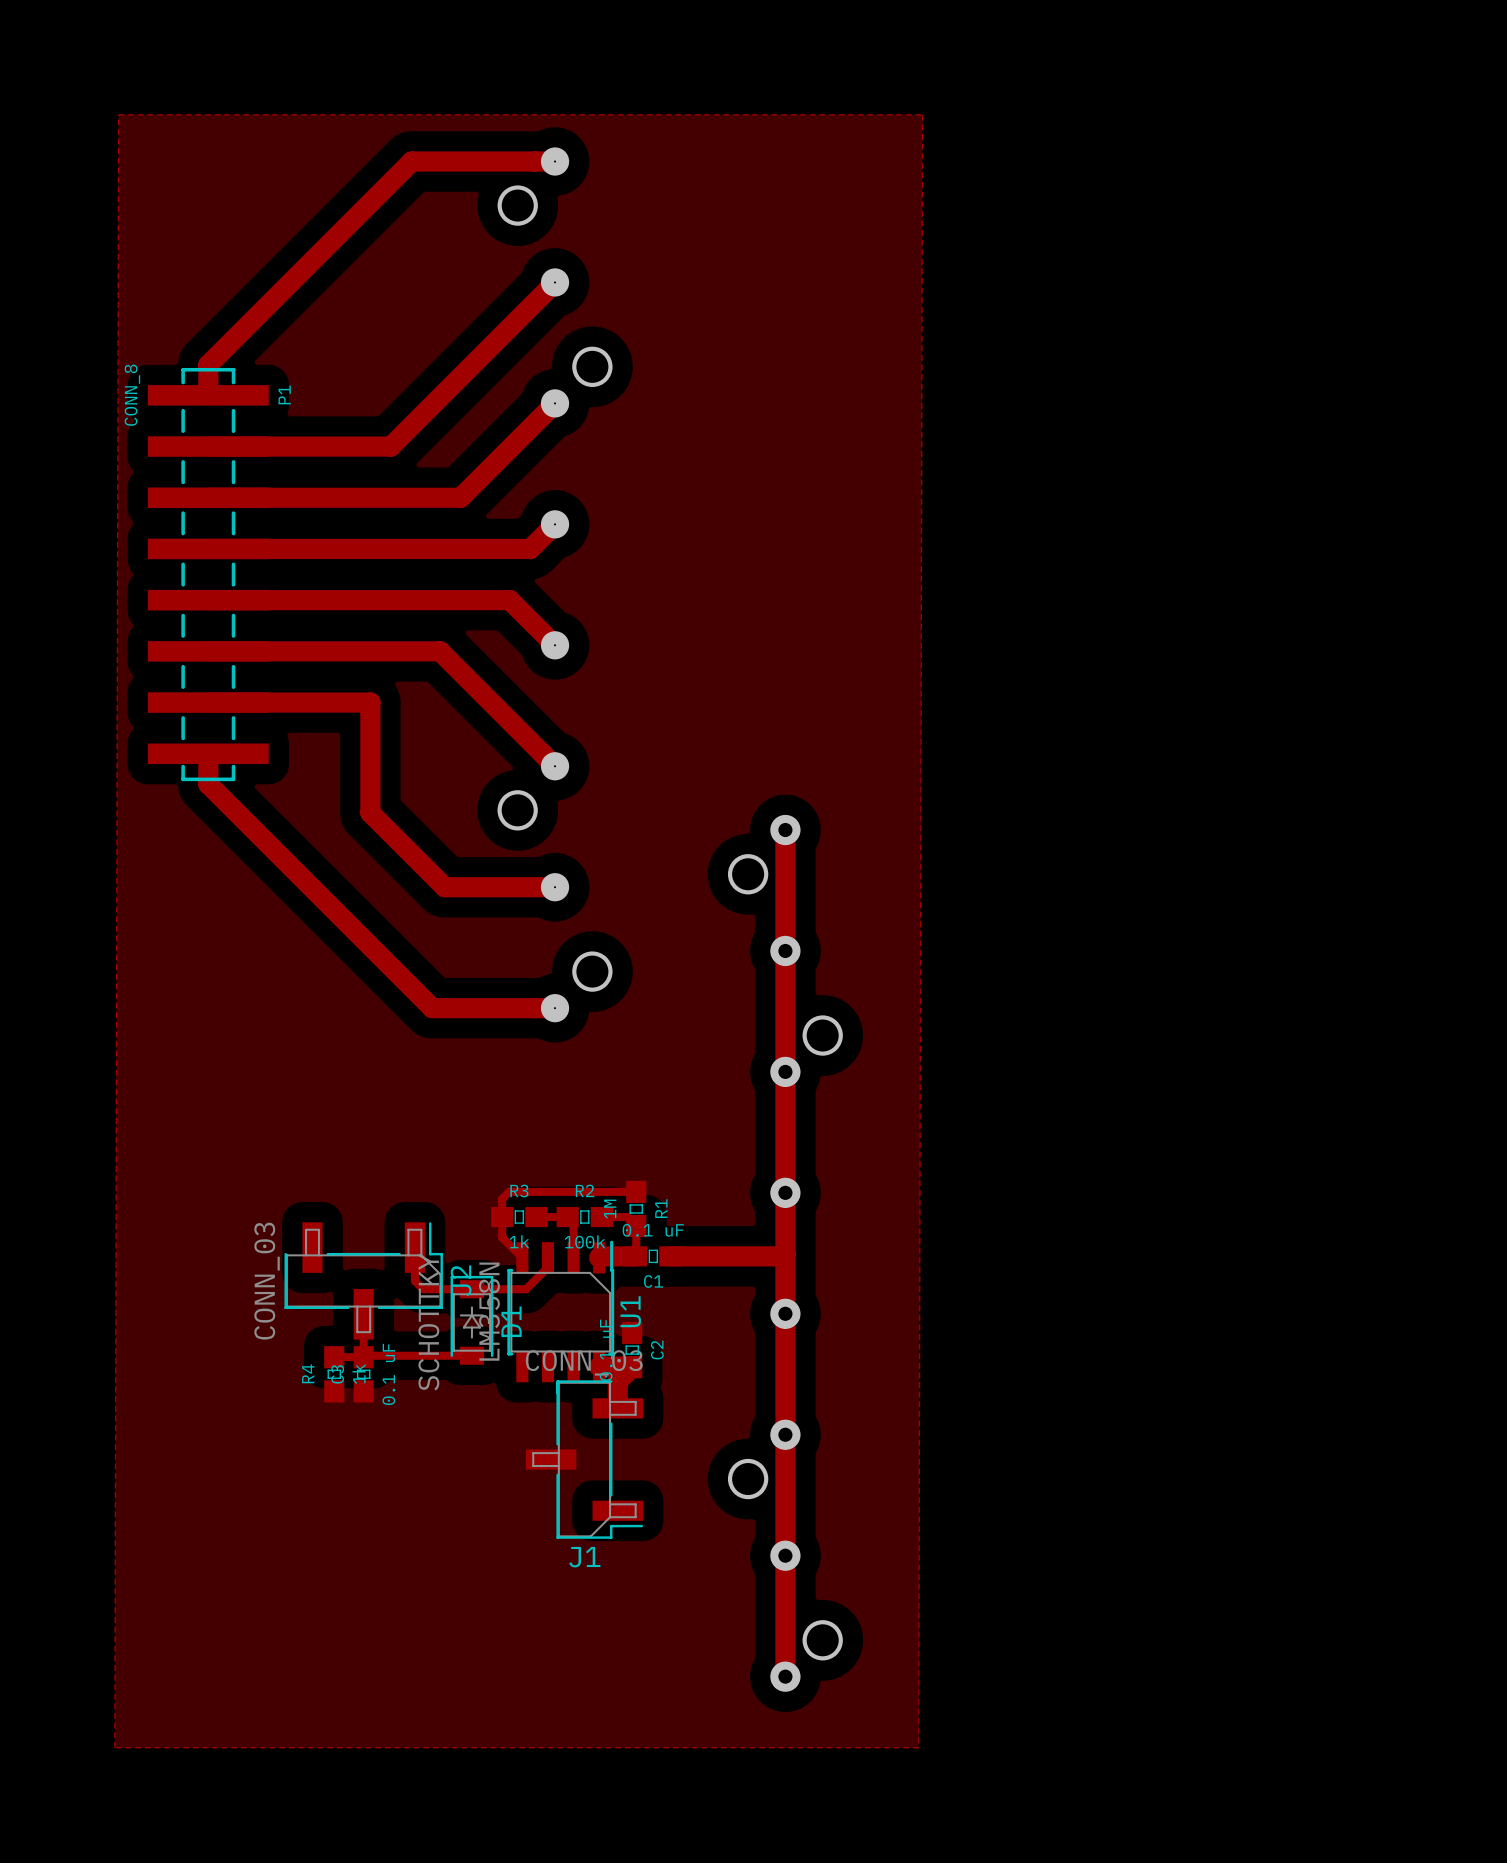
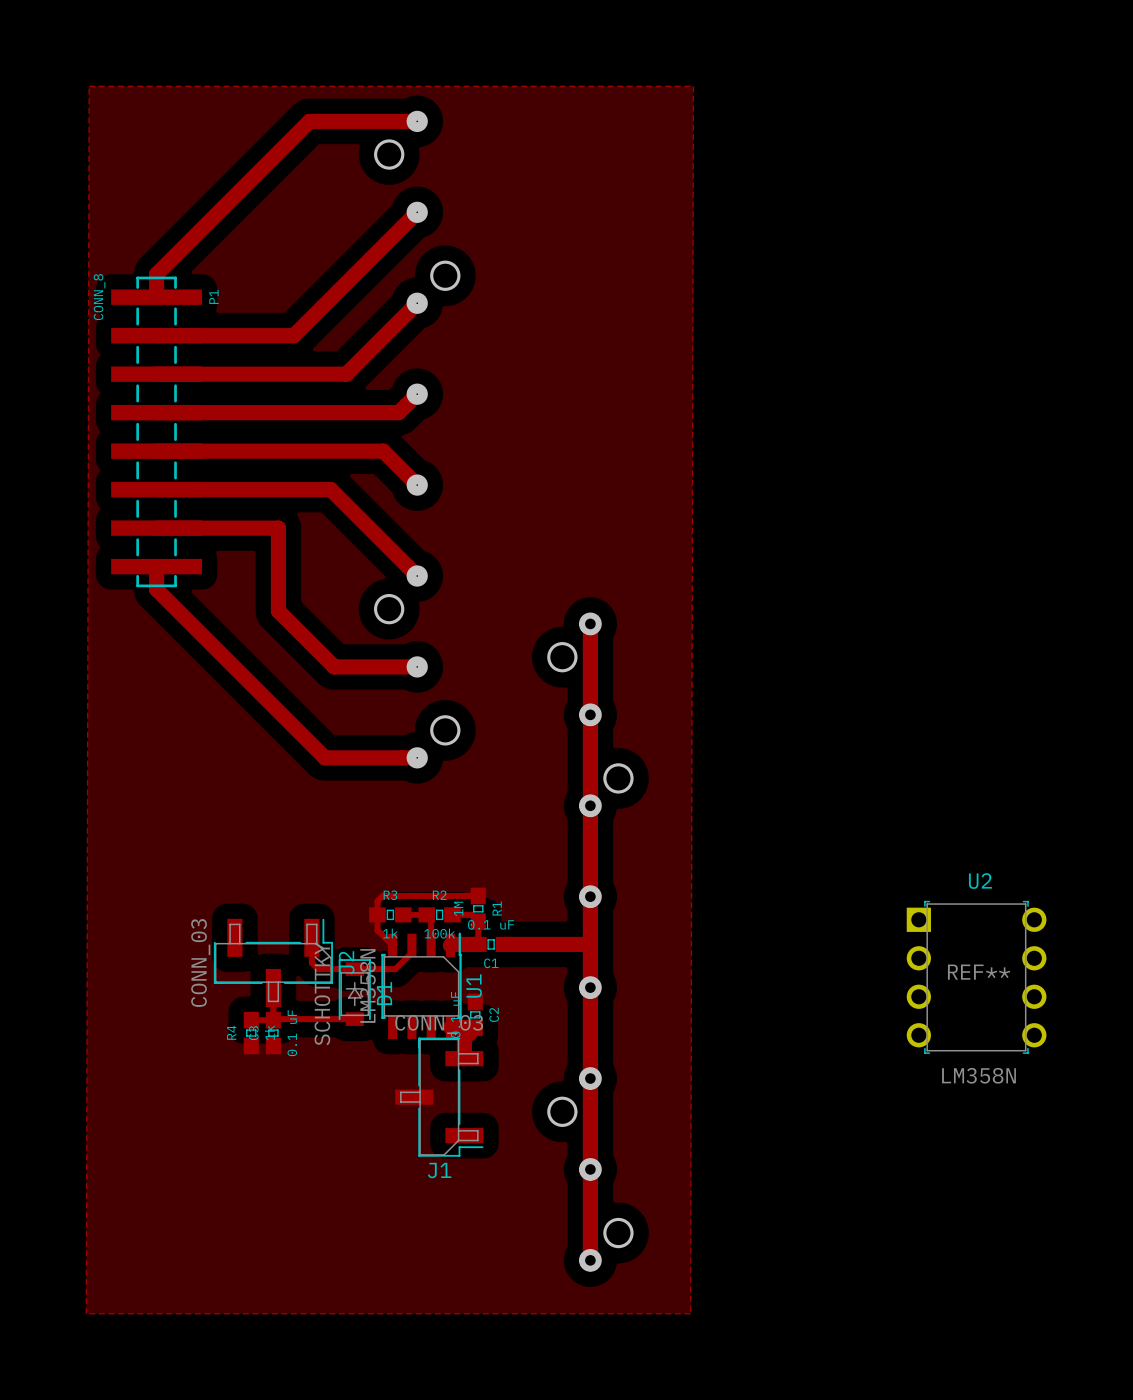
U2: none -> LM358N (976, 977)

